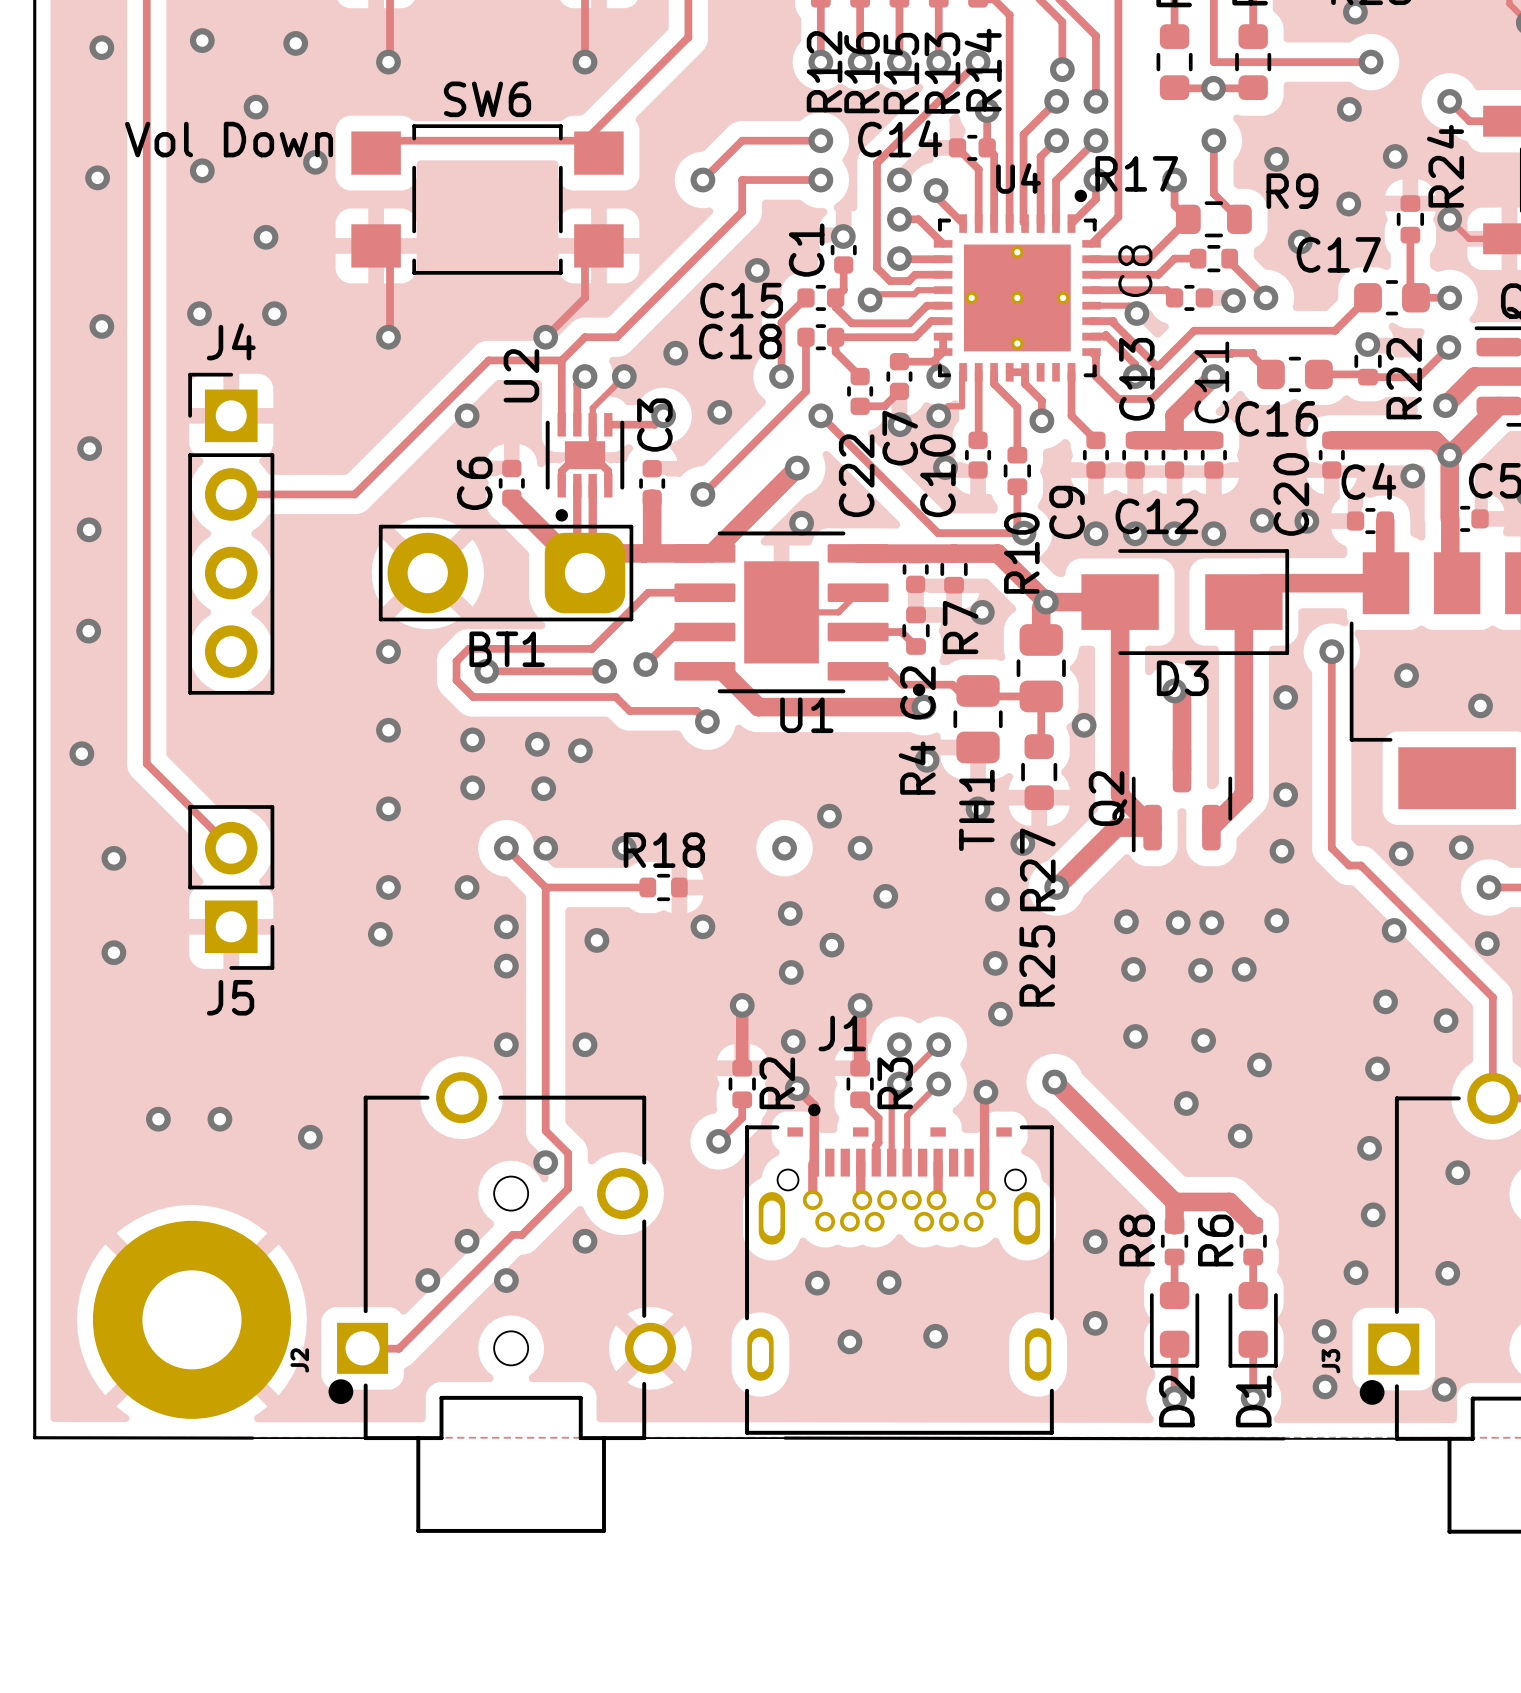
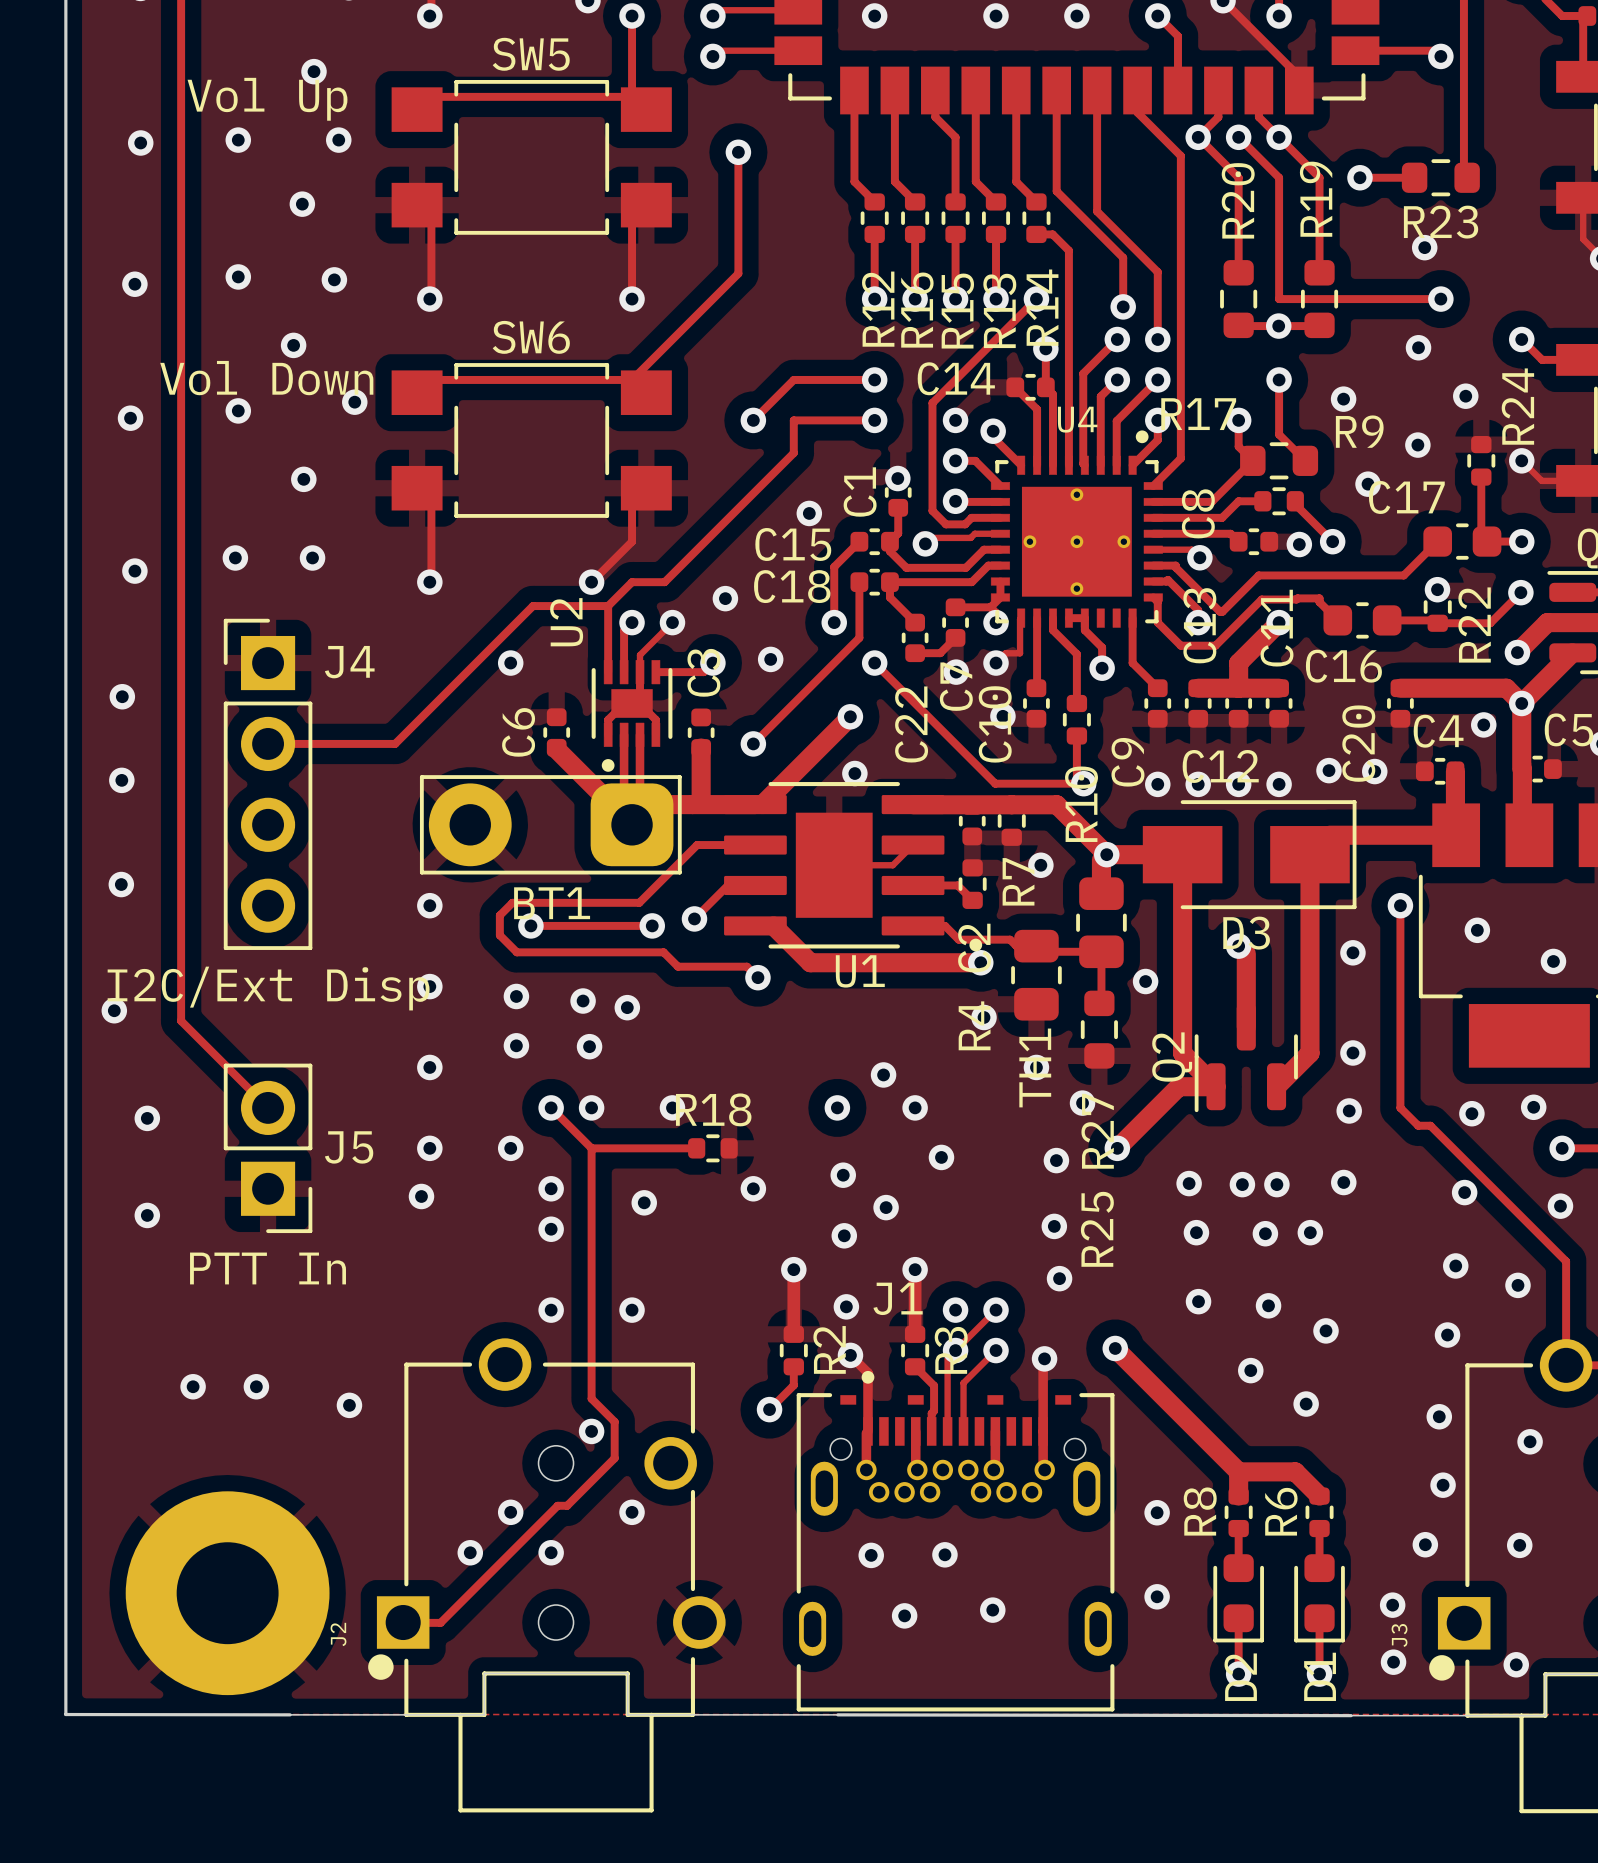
J4 name position: J4 (231, 341) -> J4 (349, 662)
text: none -> I2C/Ext Disp (268, 988)
J5 name position: J5 (230, 997) -> J5 (349, 1147)
text: none -> PTT In (268, 1268)

